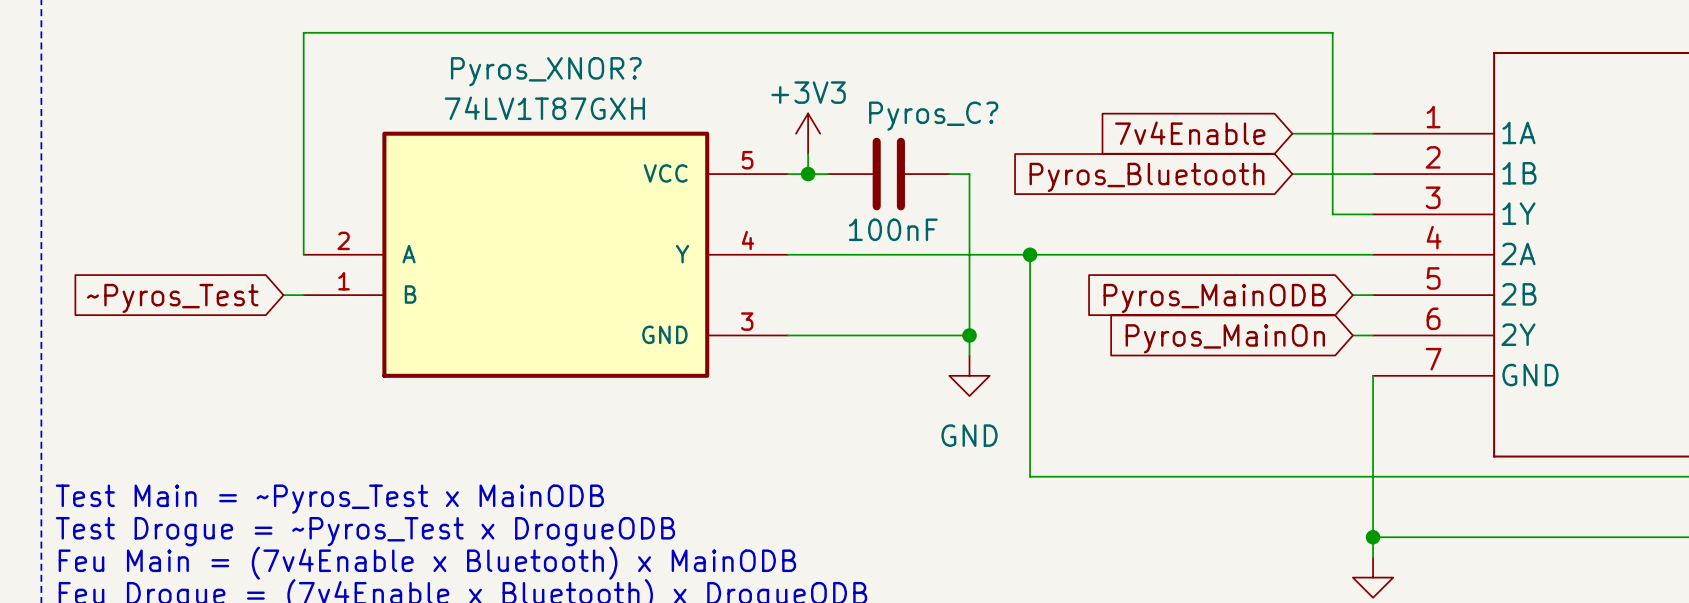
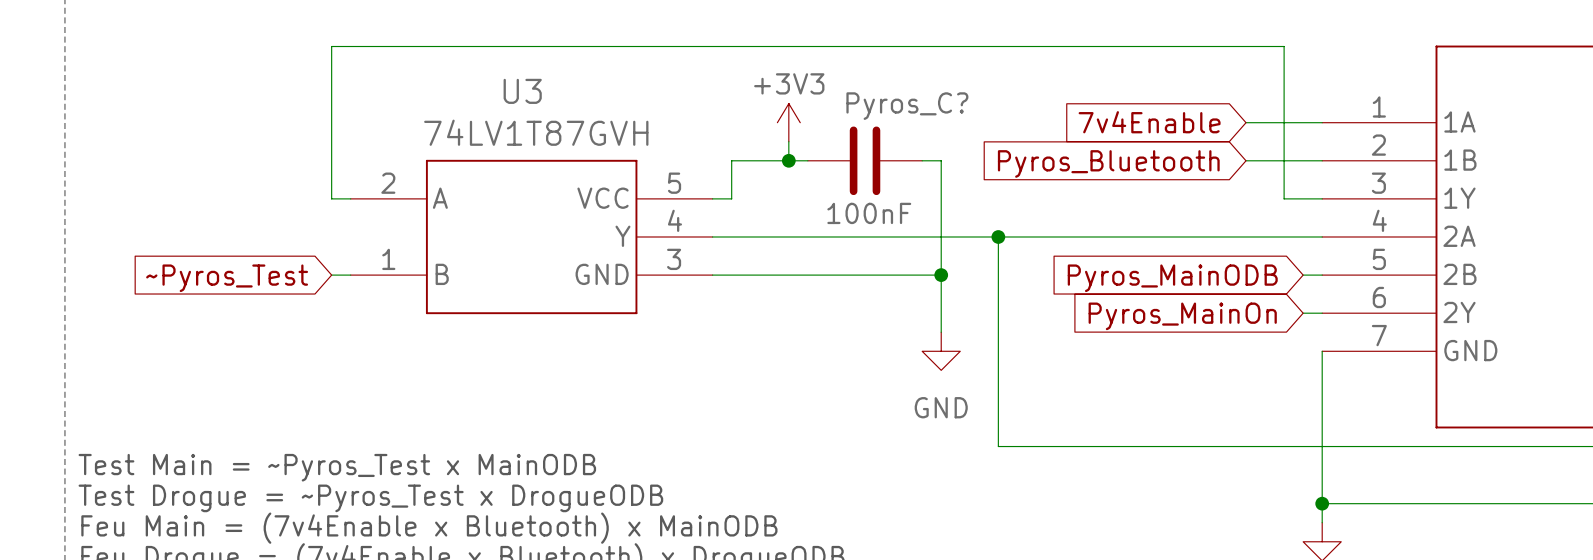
wire: (1332, 52) (1332, 32) (303, 32) (303, 254) -> (1284, 46) (331, 46) (331, 198) (350, 198)
wire: none -> (769, 160) (731, 160) (731, 198) (712, 198)
U3: none -> 74LV1T87GVH (531, 236)
Pyros_XNOR?: 74LV1T87GXH (545, 254) -> none
wire: none -> (712, 275) (941, 275)
global label position: ~Pyros_Test (172, 298) -> ~Pyros_Test (227, 278)
wire: (787, 335) (969, 335) -> none
junction position: (969, 335) -> (941, 275)

